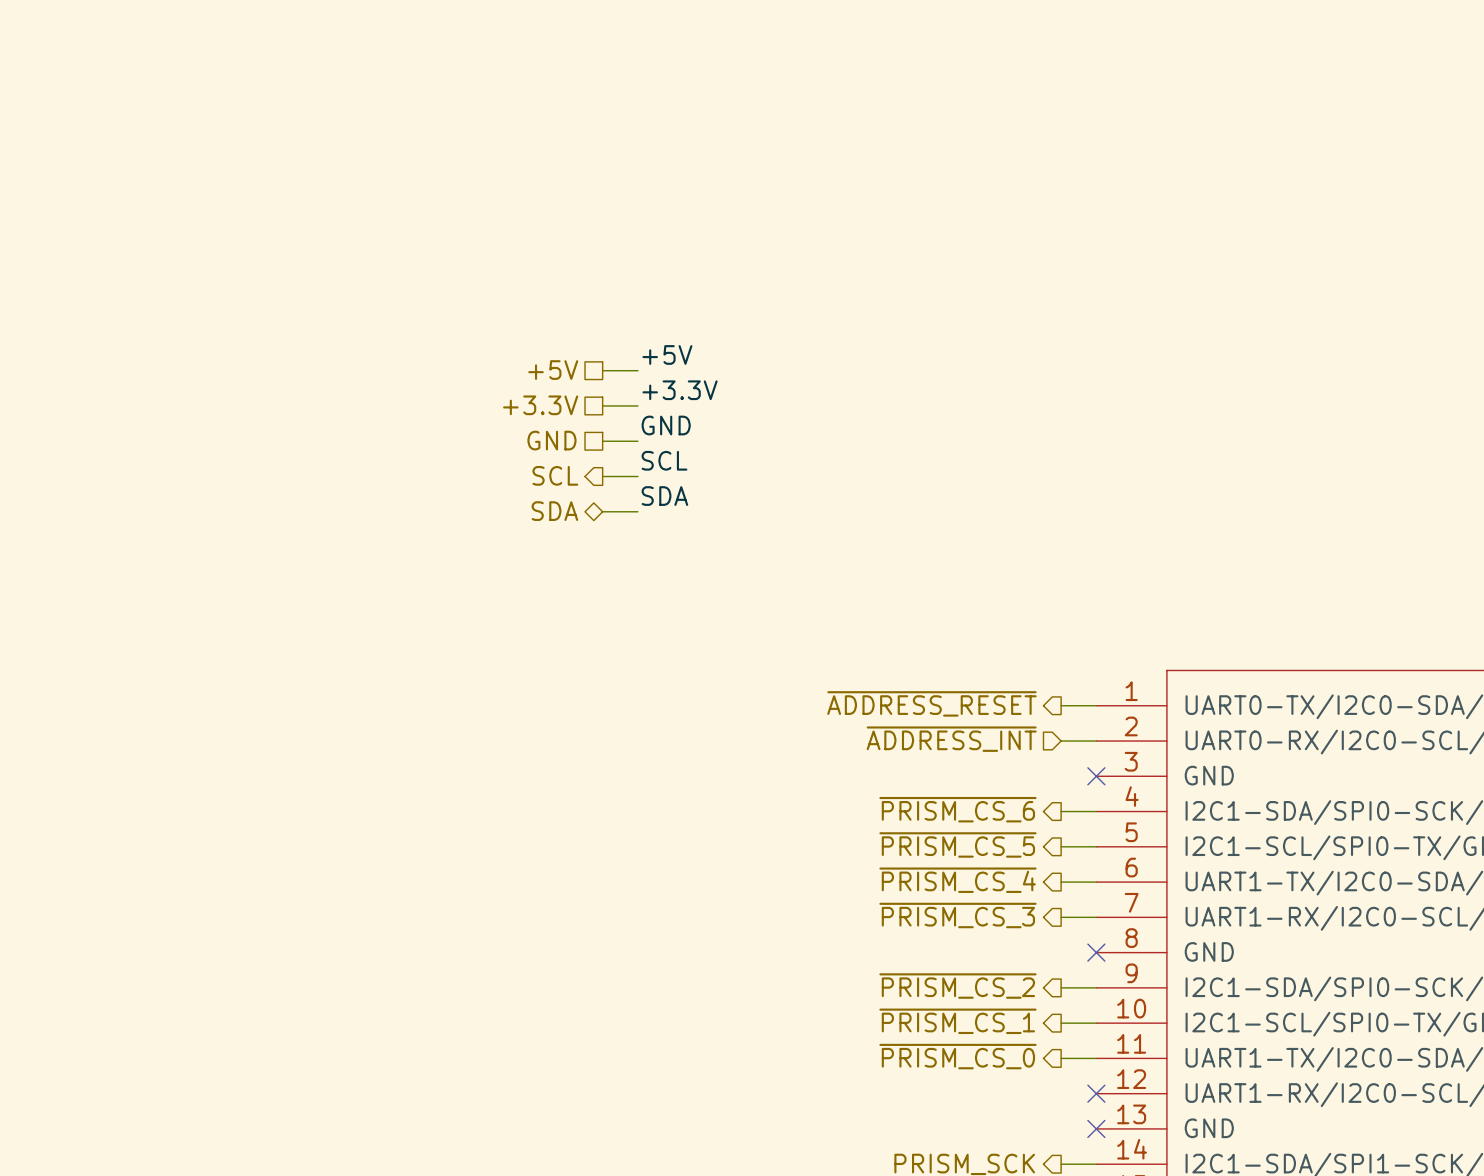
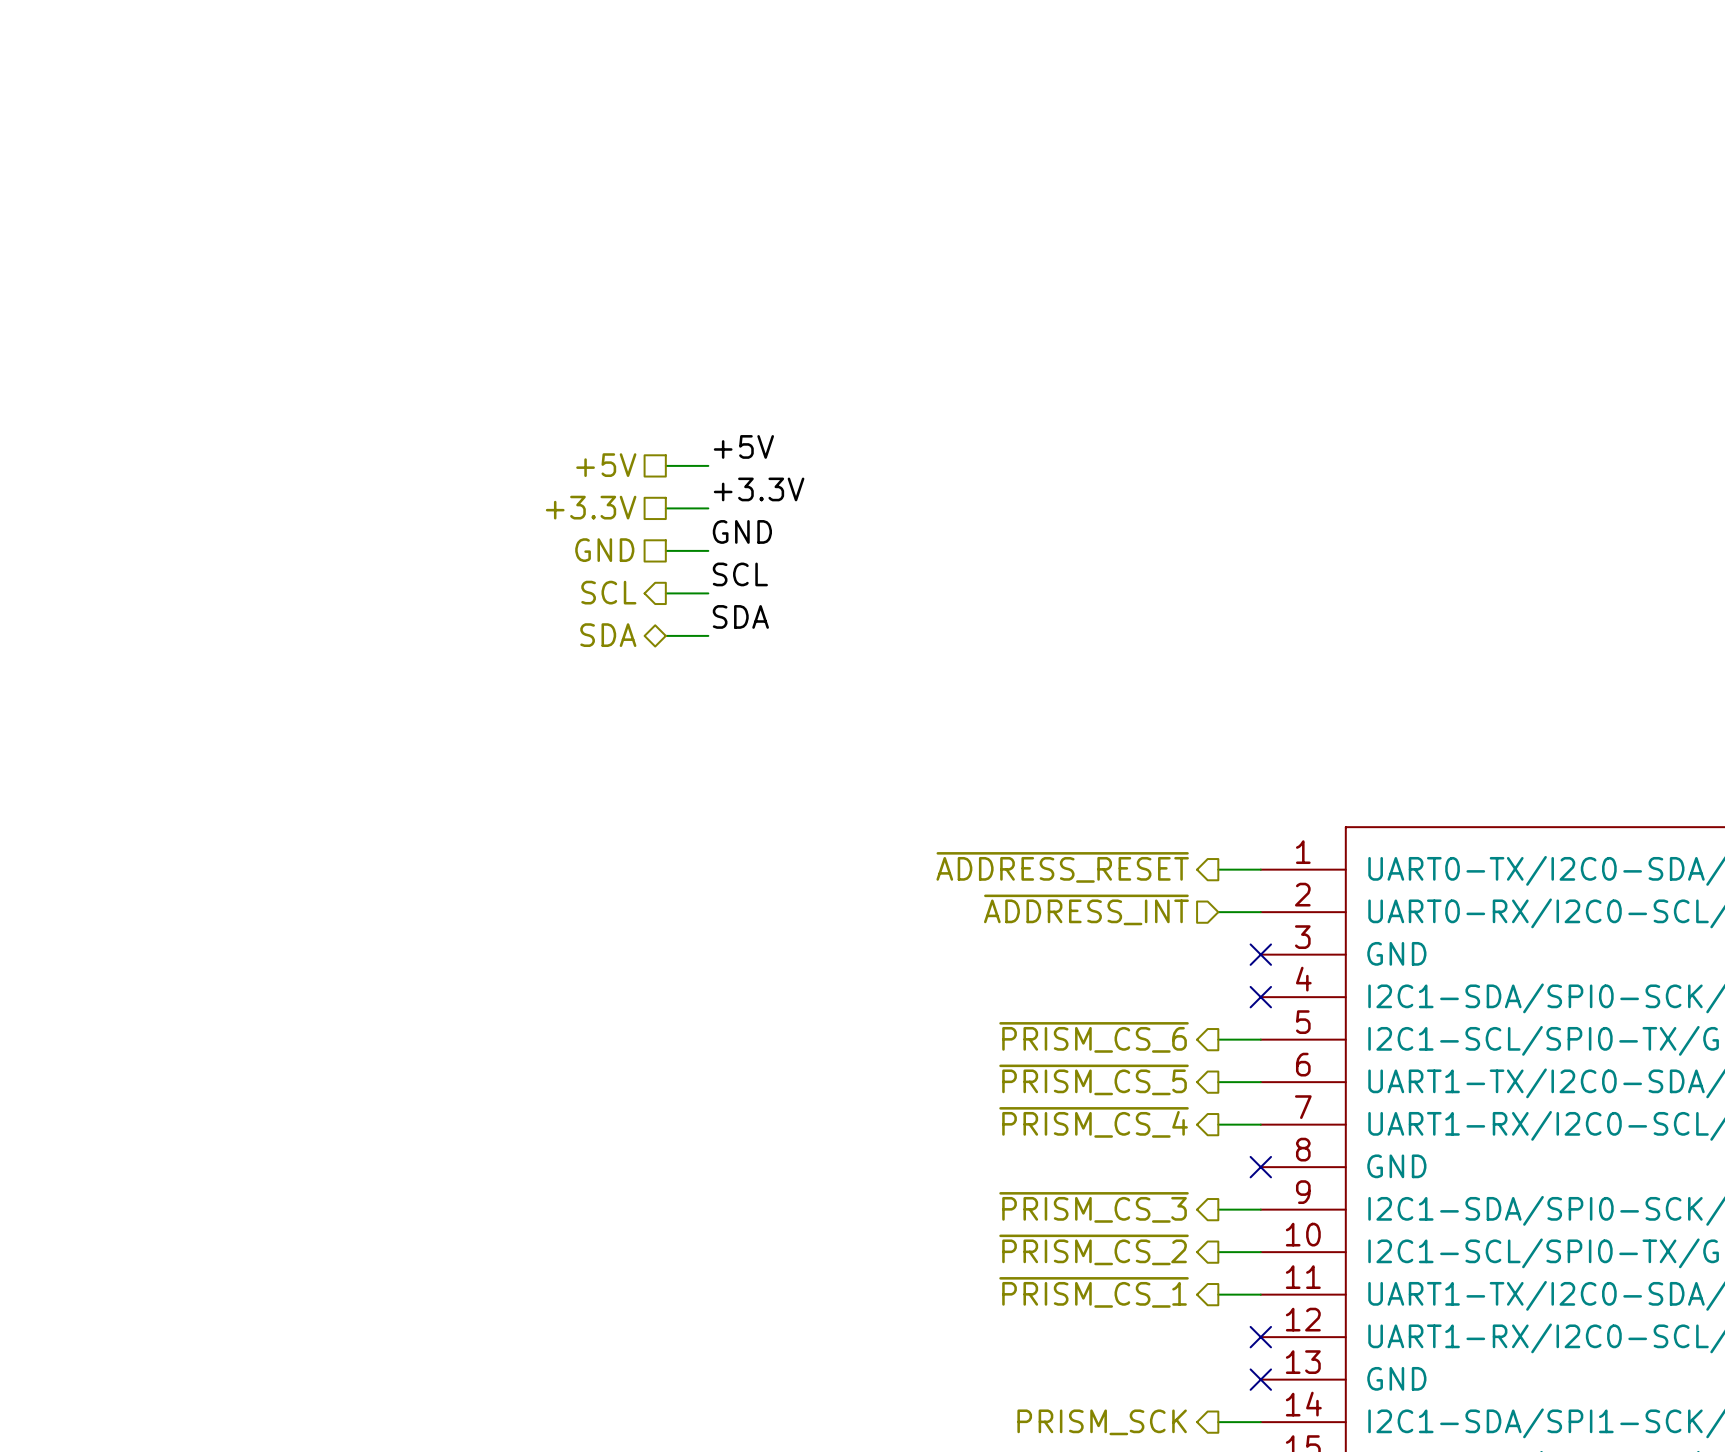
hierarchical label: ~{PRISM_CS_6} (957, 809) -> none
wire: (1061, 811) (1096, 811) -> none
no-connect mark: none -> (1260, 997)
hierarchical label: ~{PRISM_CS_5} (957, 844) -> ~{PRISM_CS_6} (1094, 1037)
hierarchical label: ~{PRISM_CS_4} (957, 880) -> ~{PRISM_CS_5} (1094, 1079)
hierarchical label: ~{PRISM_CS_3} (957, 915) -> ~{PRISM_CS_4} (1094, 1122)
hierarchical label: ~{PRISM_CS_2} (957, 986) -> ~{PRISM_CS_3} (1094, 1207)
hierarchical label: ~{PRISM_CS_1} (957, 1021) -> ~{PRISM_CS_2} (1094, 1249)
hierarchical label: ~{PRISM_CS_0} (957, 1056) -> ~{PRISM_CS_1} (1094, 1292)

